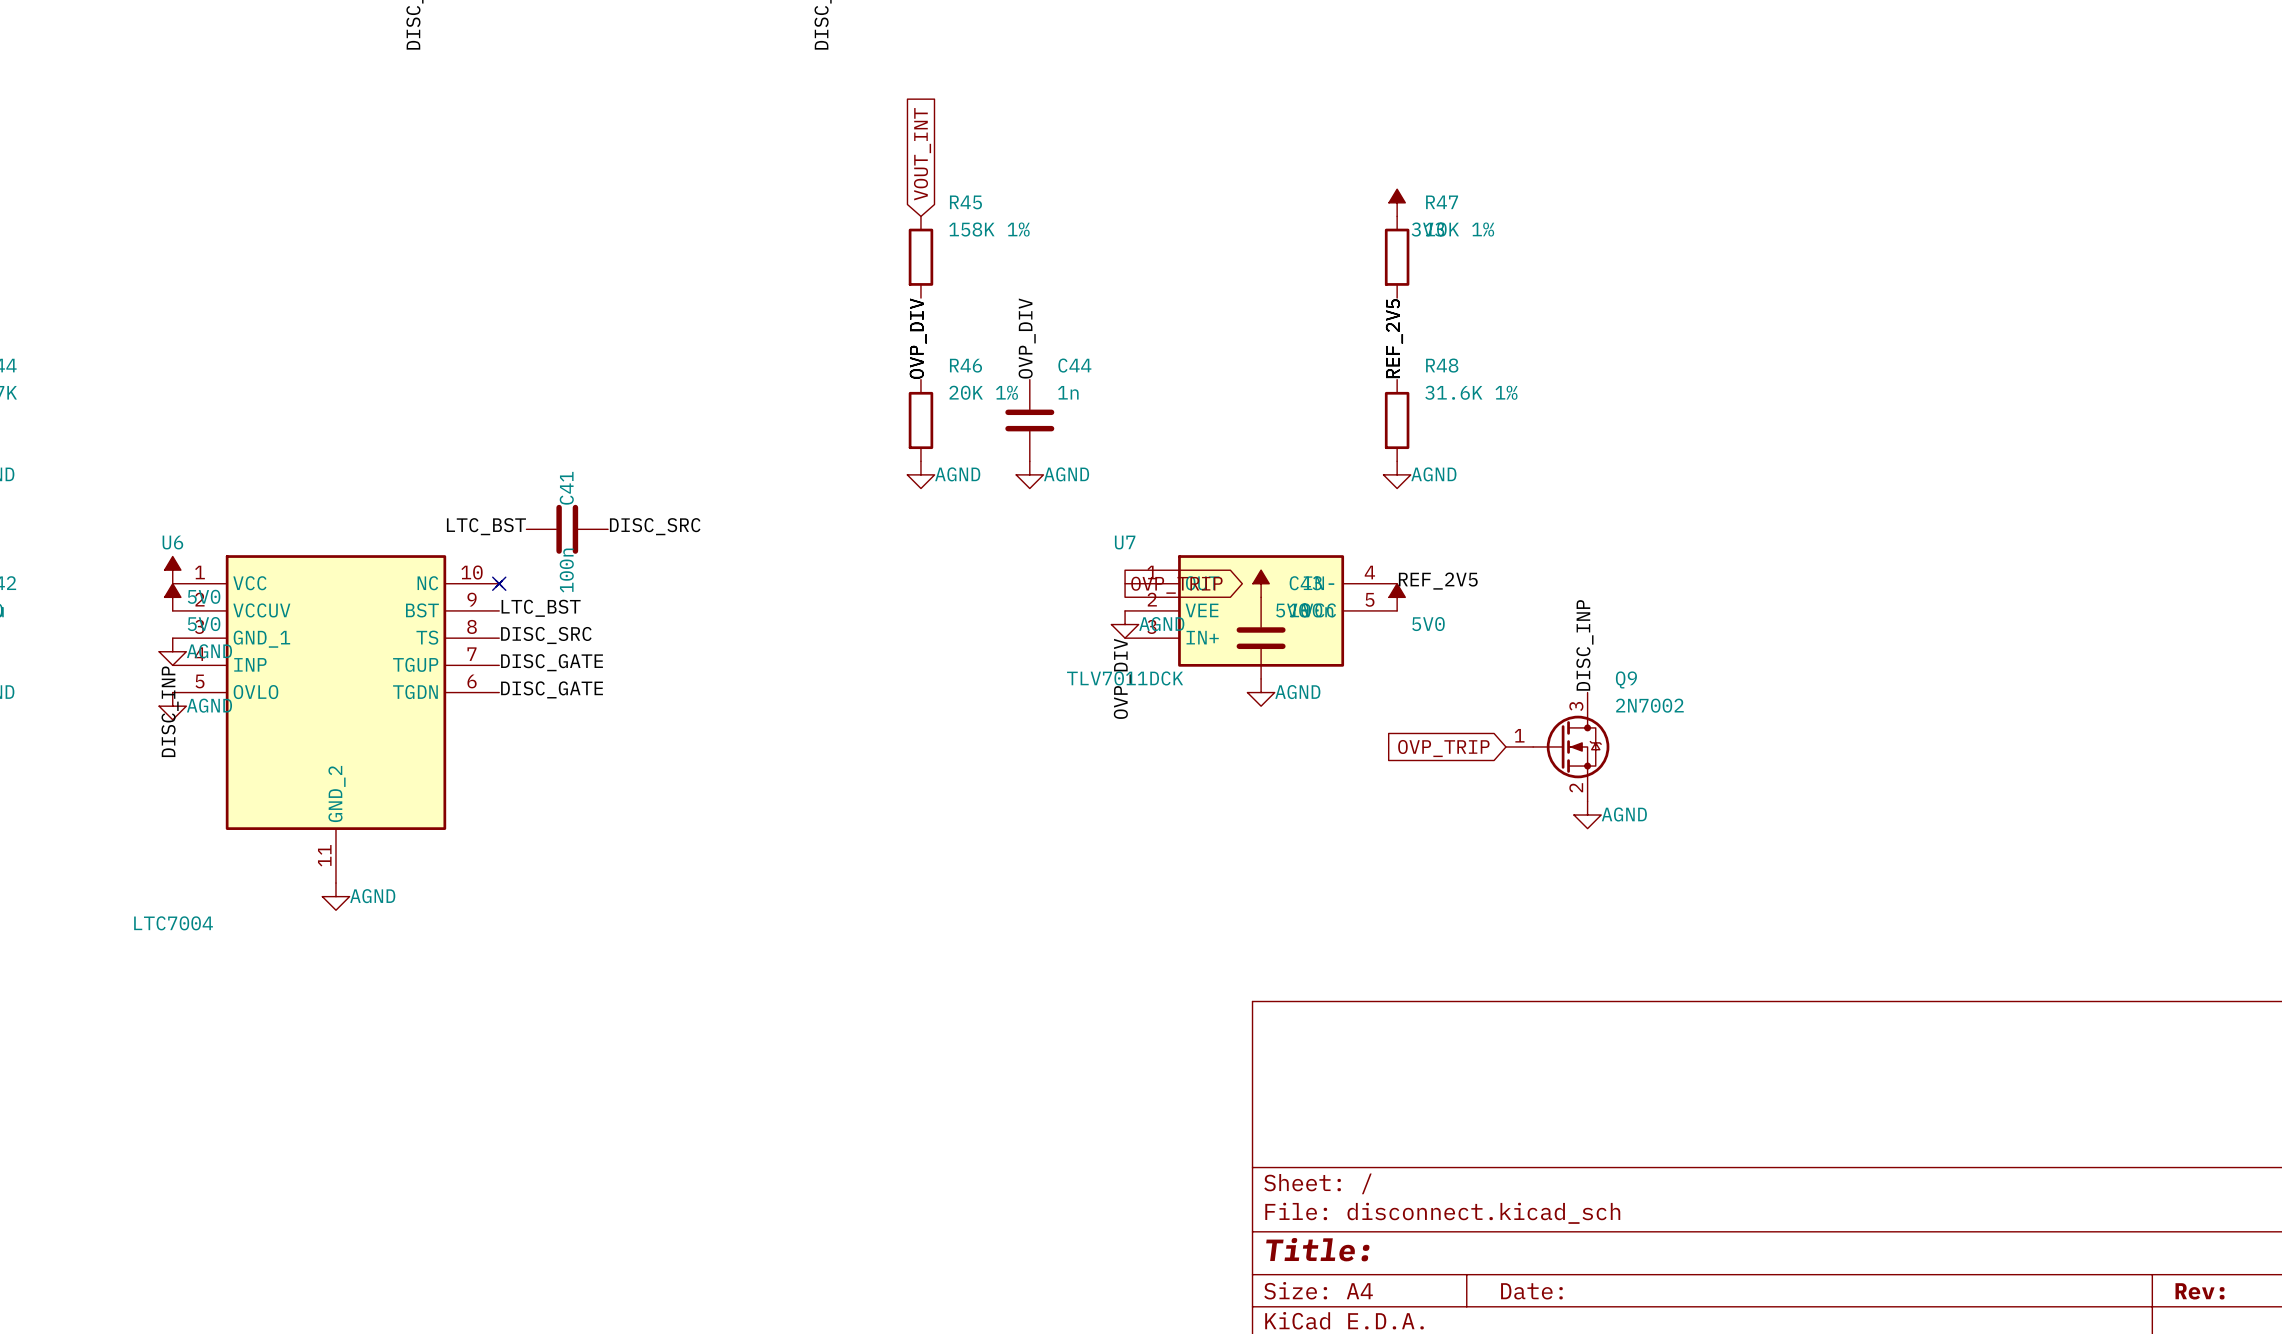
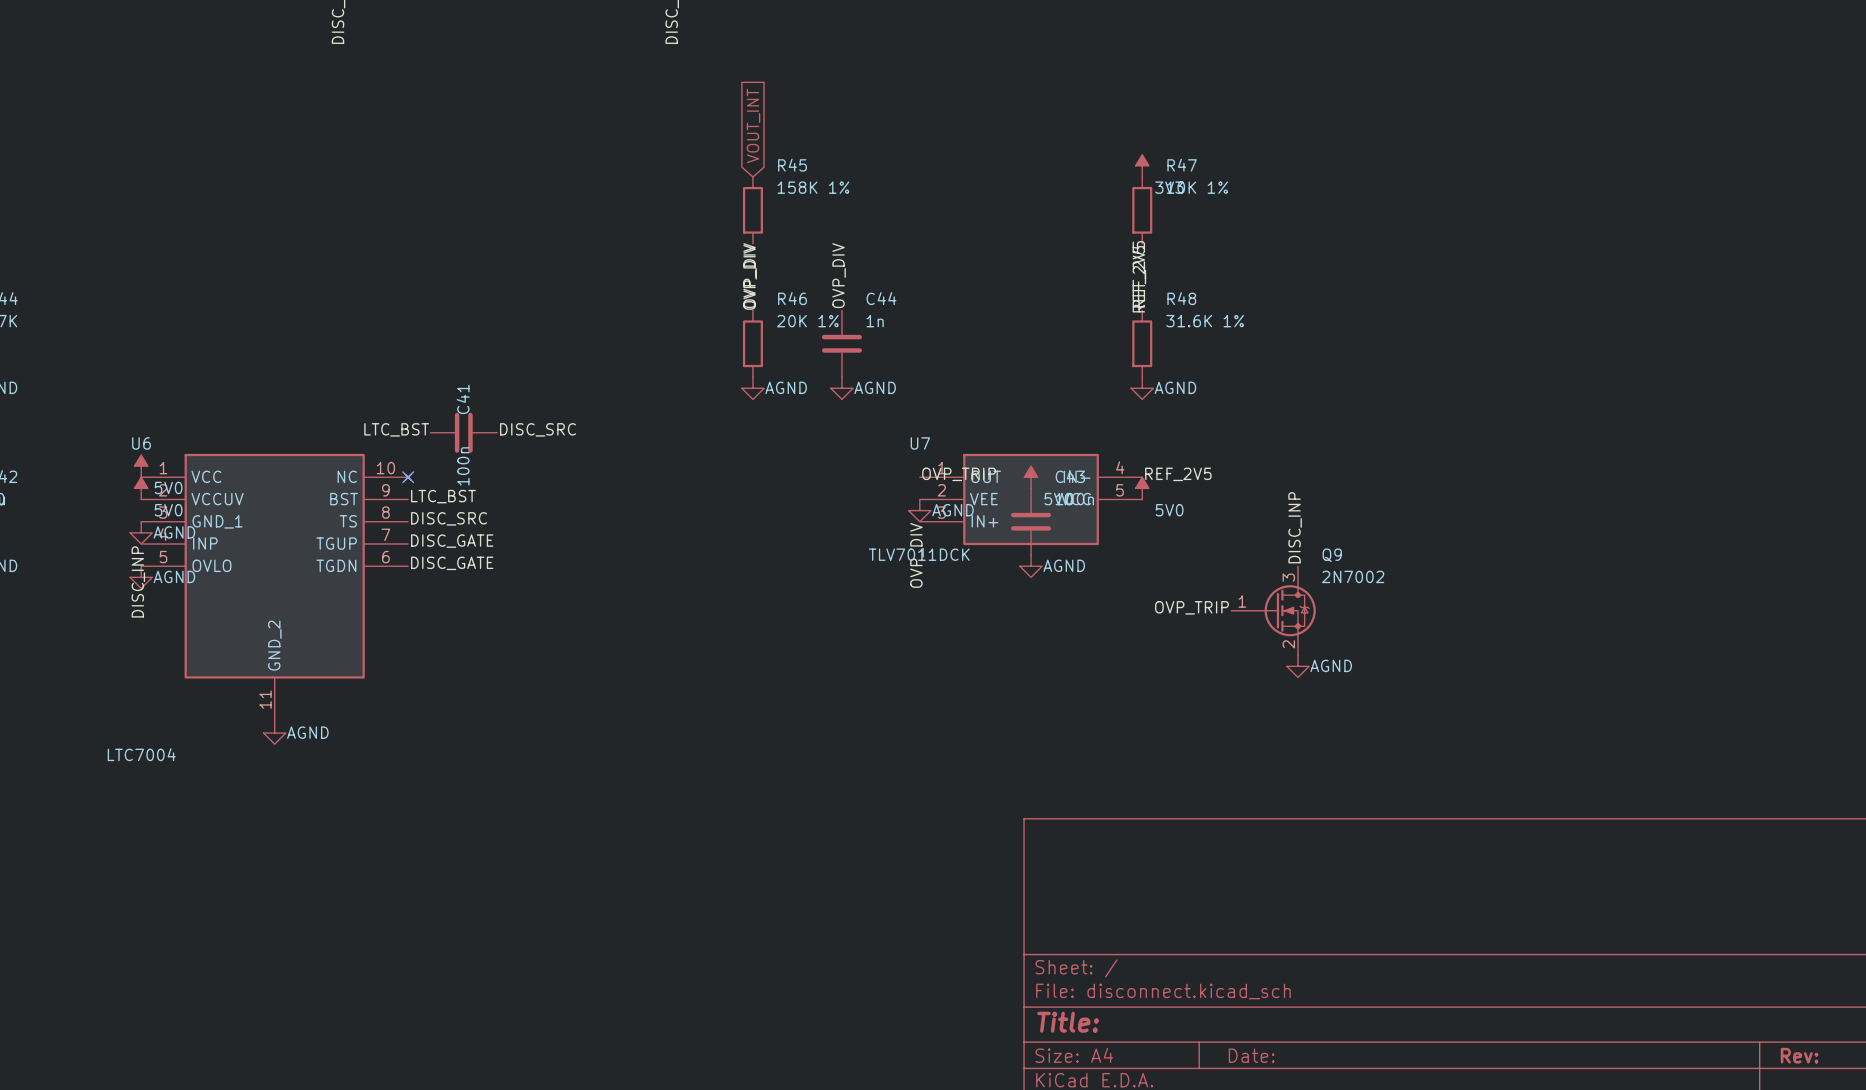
label: none -> OVP_TRIP (959, 474)
global label: OVP_TRIP (1176, 585) -> none
label: none -> OVP_TRIP (1191, 607)
global label: OVP_TRIP (1443, 748) -> none

